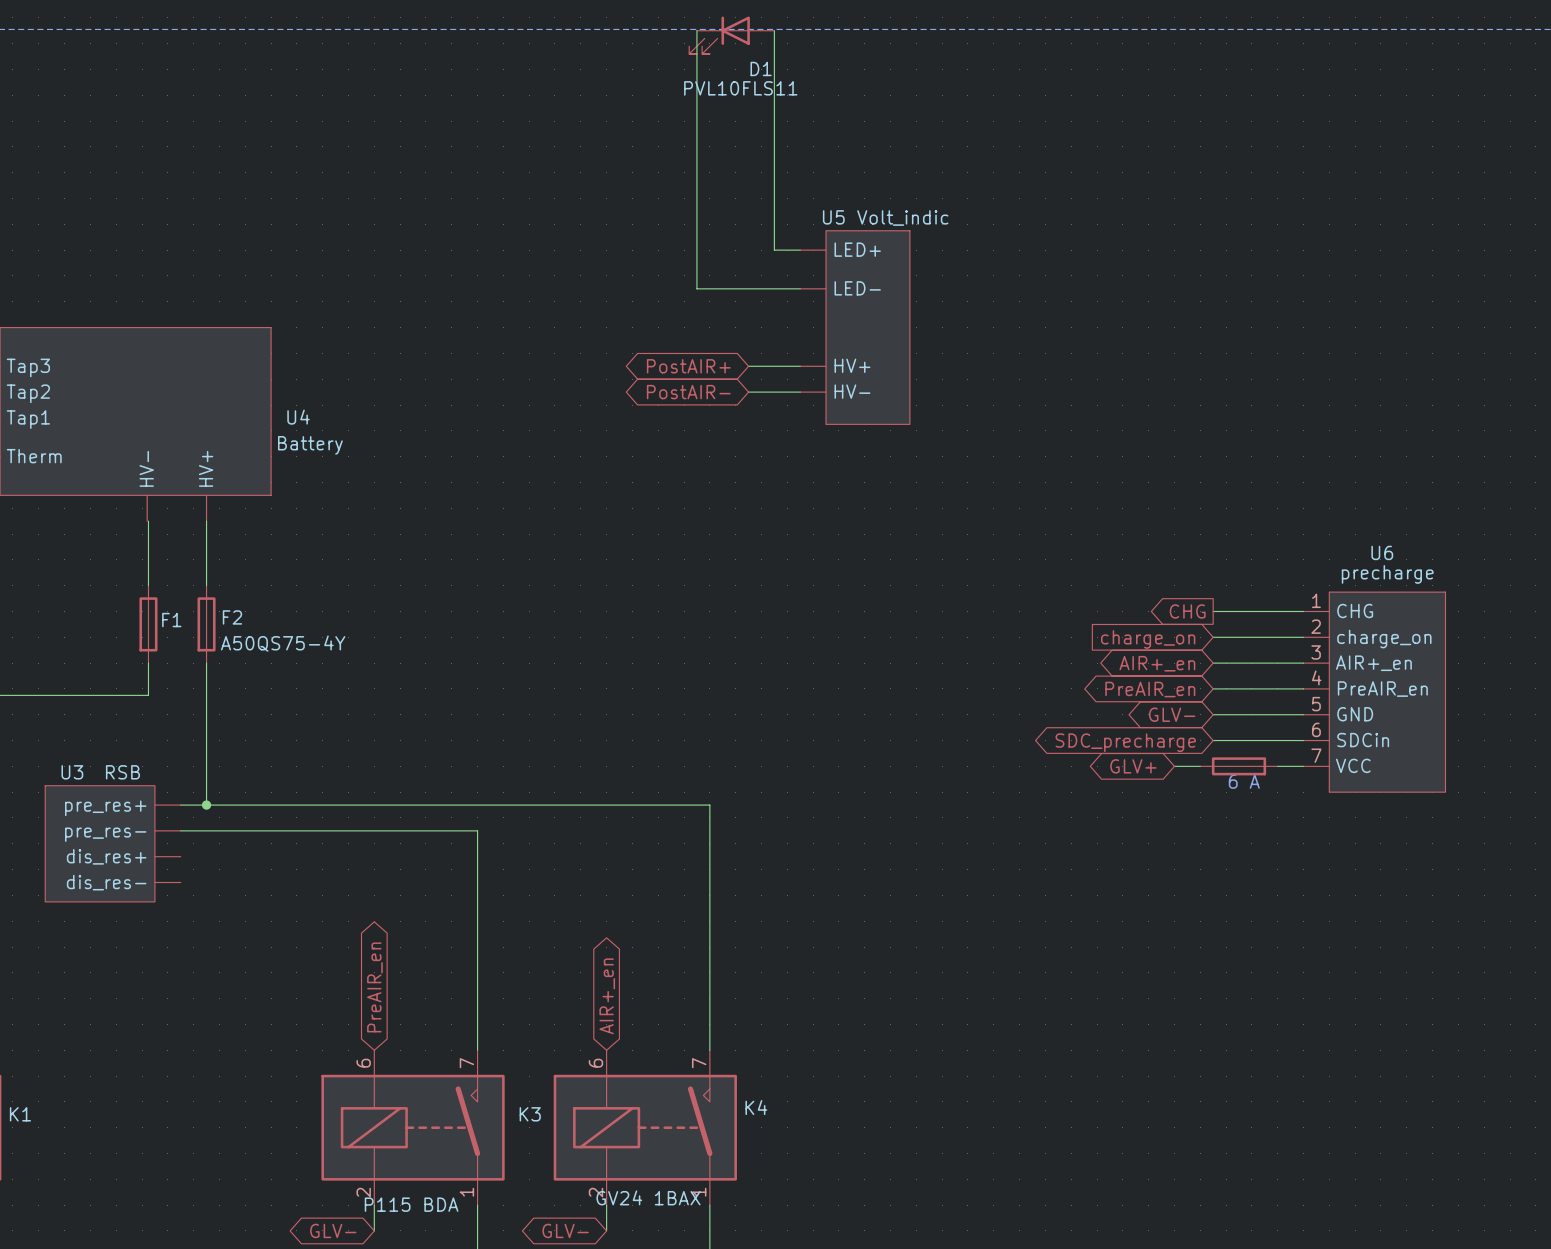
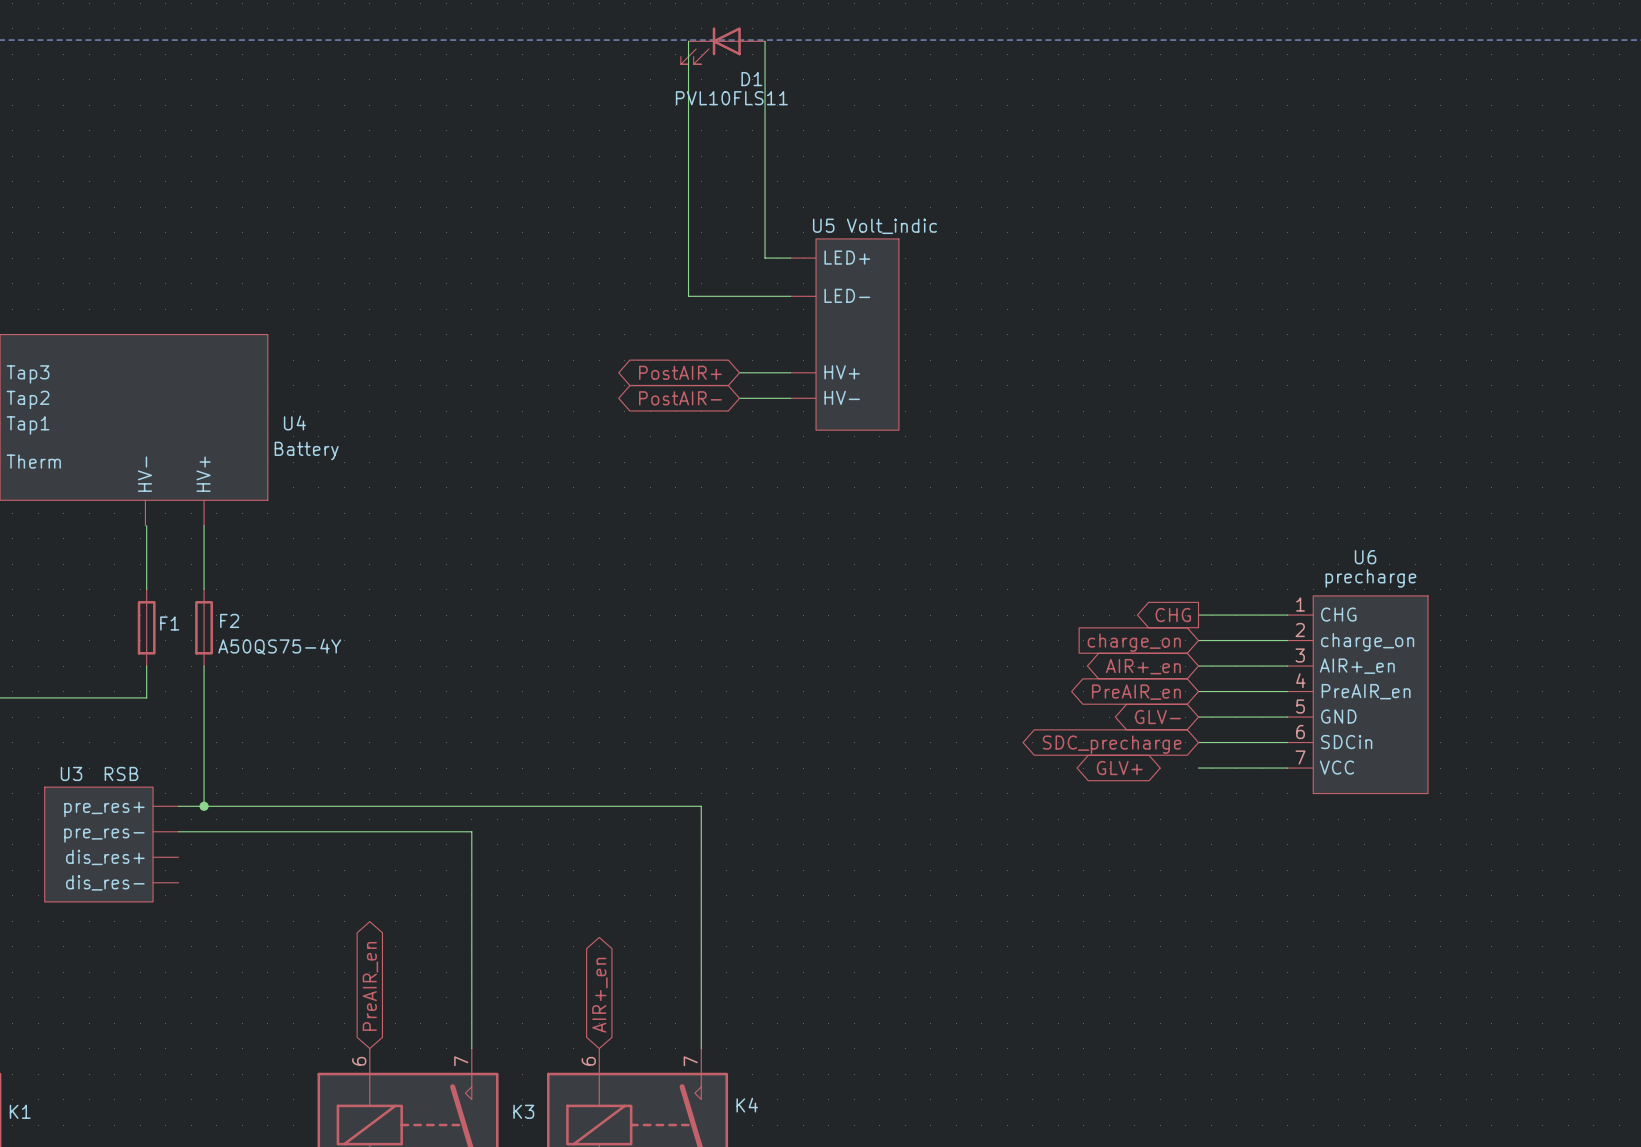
wire: (1174, 766) (1200, 766) -> none
part: (1238, 766) -> none
text: 6 A (1244, 781) -> none

